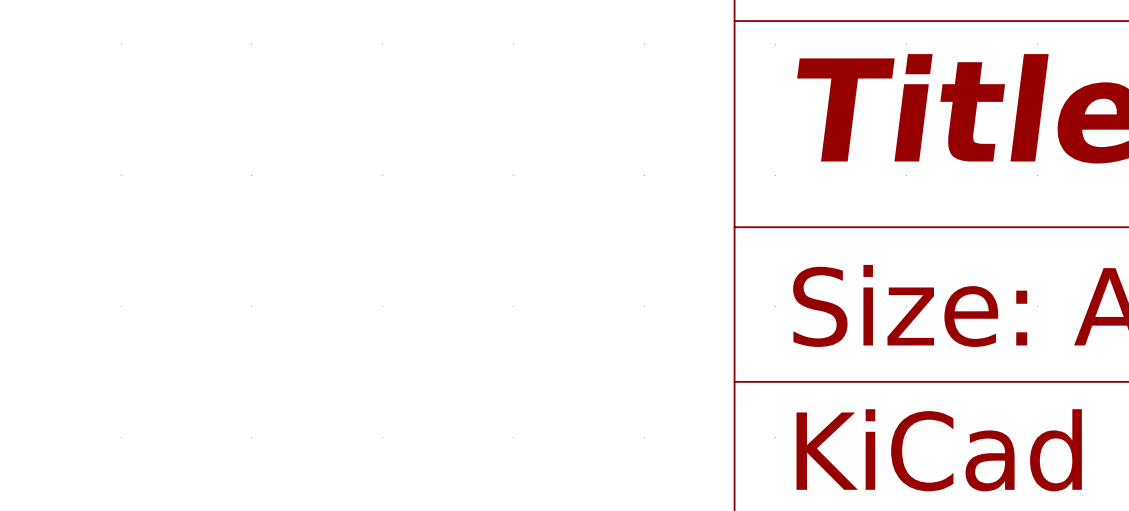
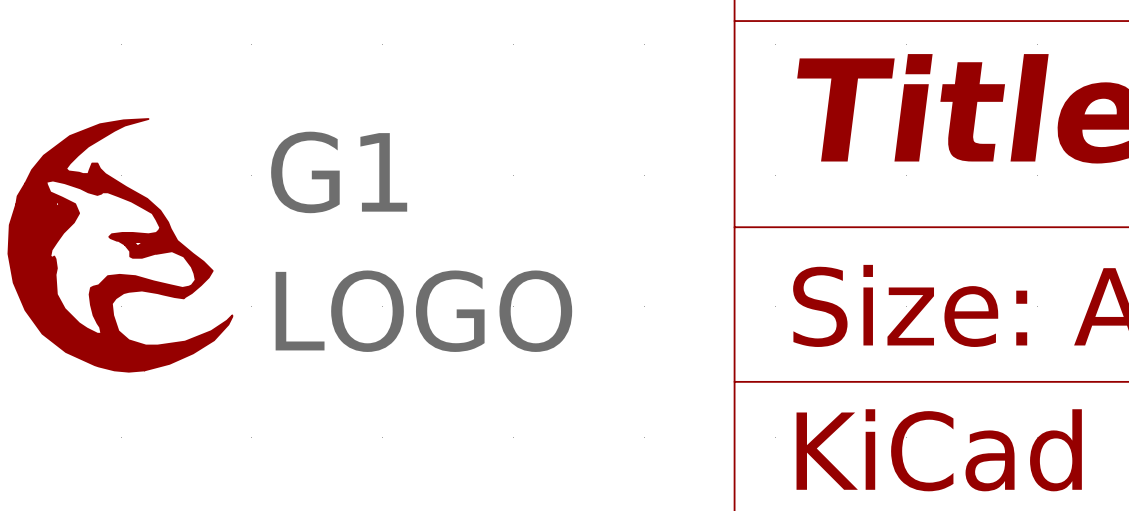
G1: none -> LOGO (120, 245)

